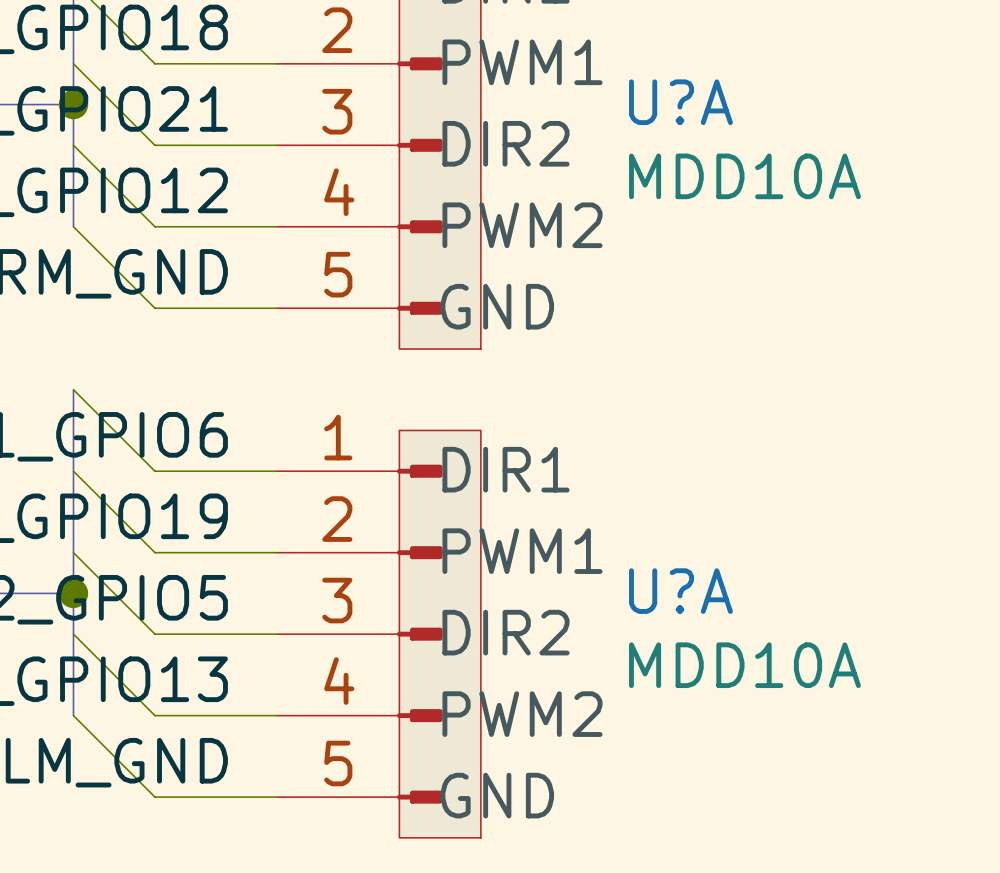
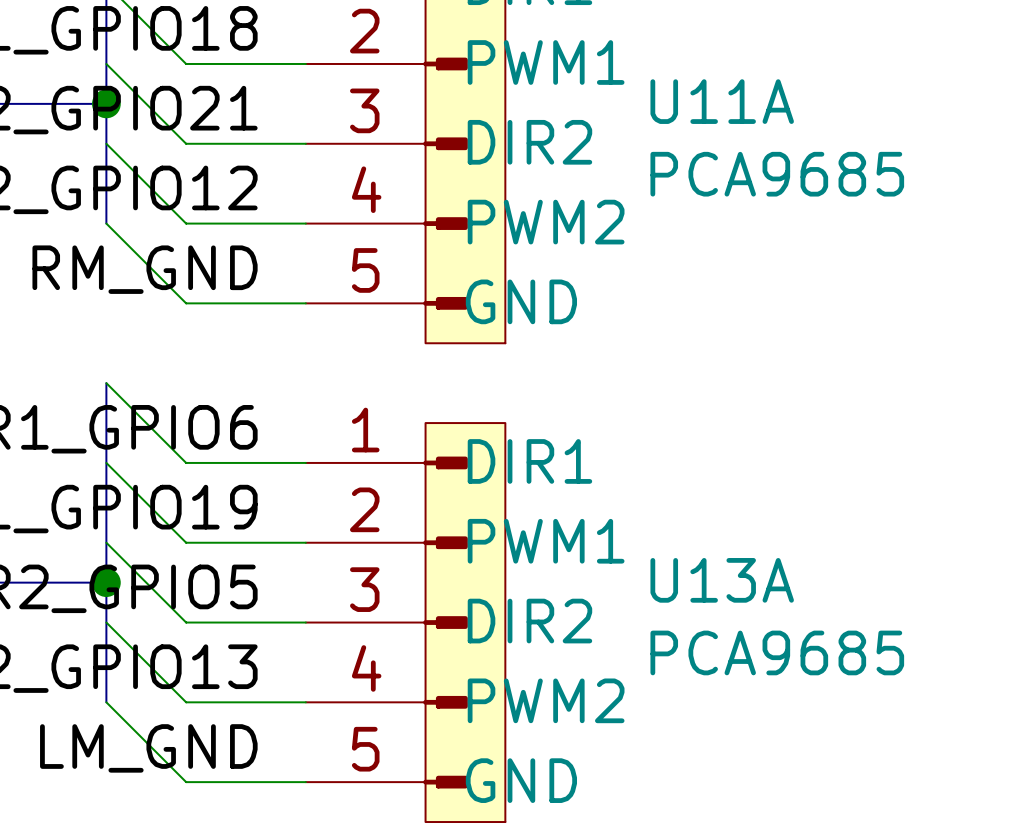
U?A name: U?A (680, 102) -> U11A (722, 101)
U?A value: MDD10A (744, 176) -> PCA9685 (777, 174)
U?A name: U?A (680, 591) -> U13A (722, 580)
U?A value: MDD10A (744, 665) -> PCA9685 (777, 652)

